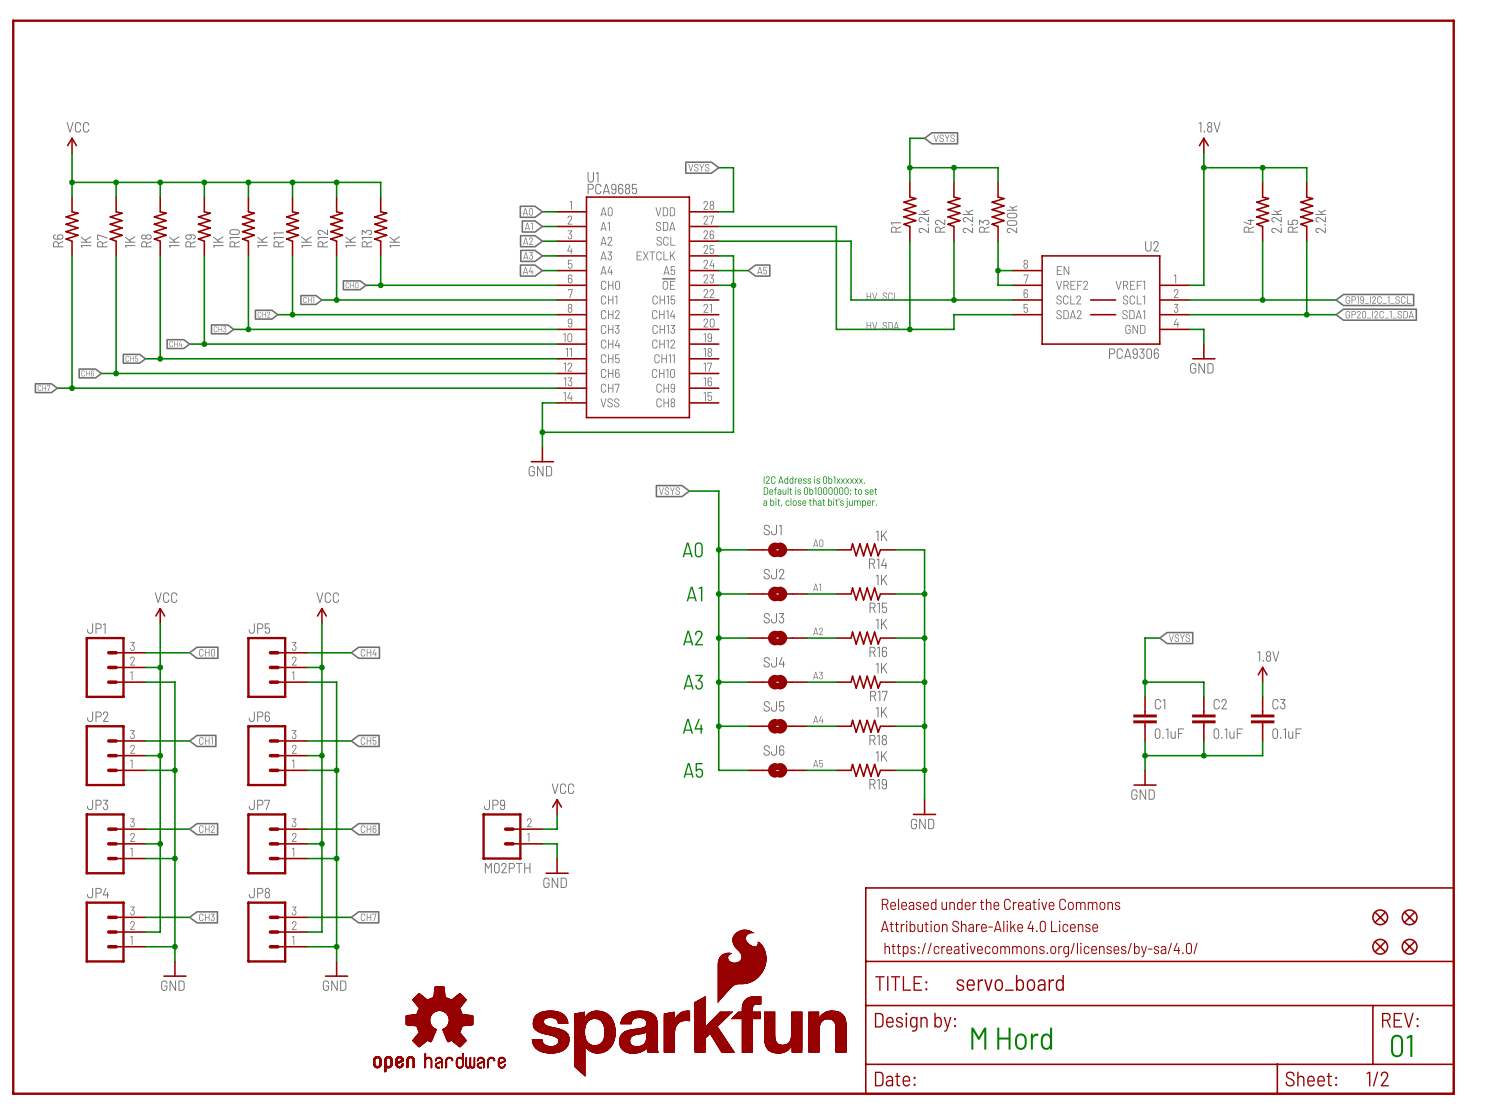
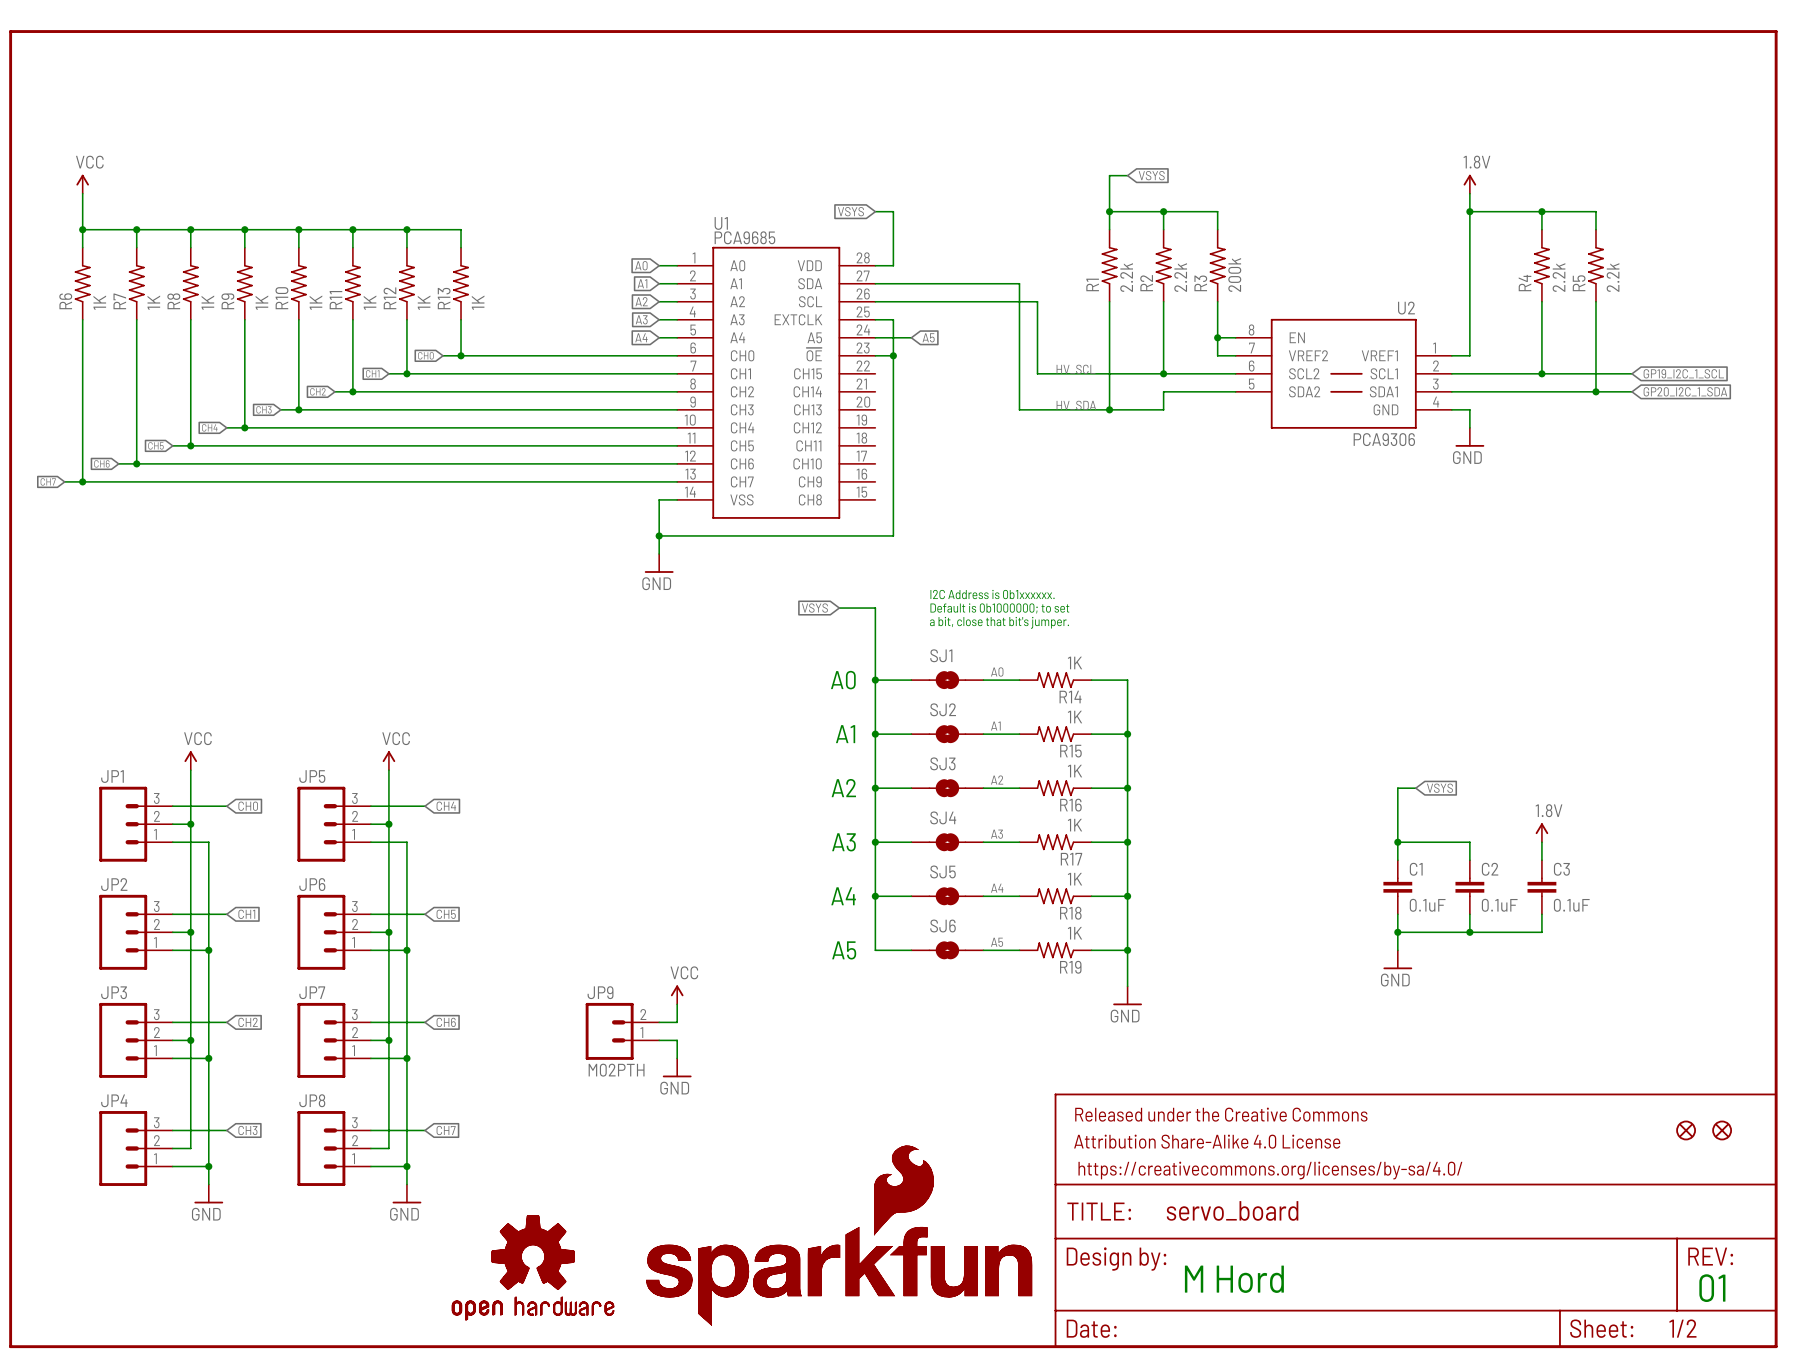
part: (1380, 946) -> none
part: (1409, 946) -> none

